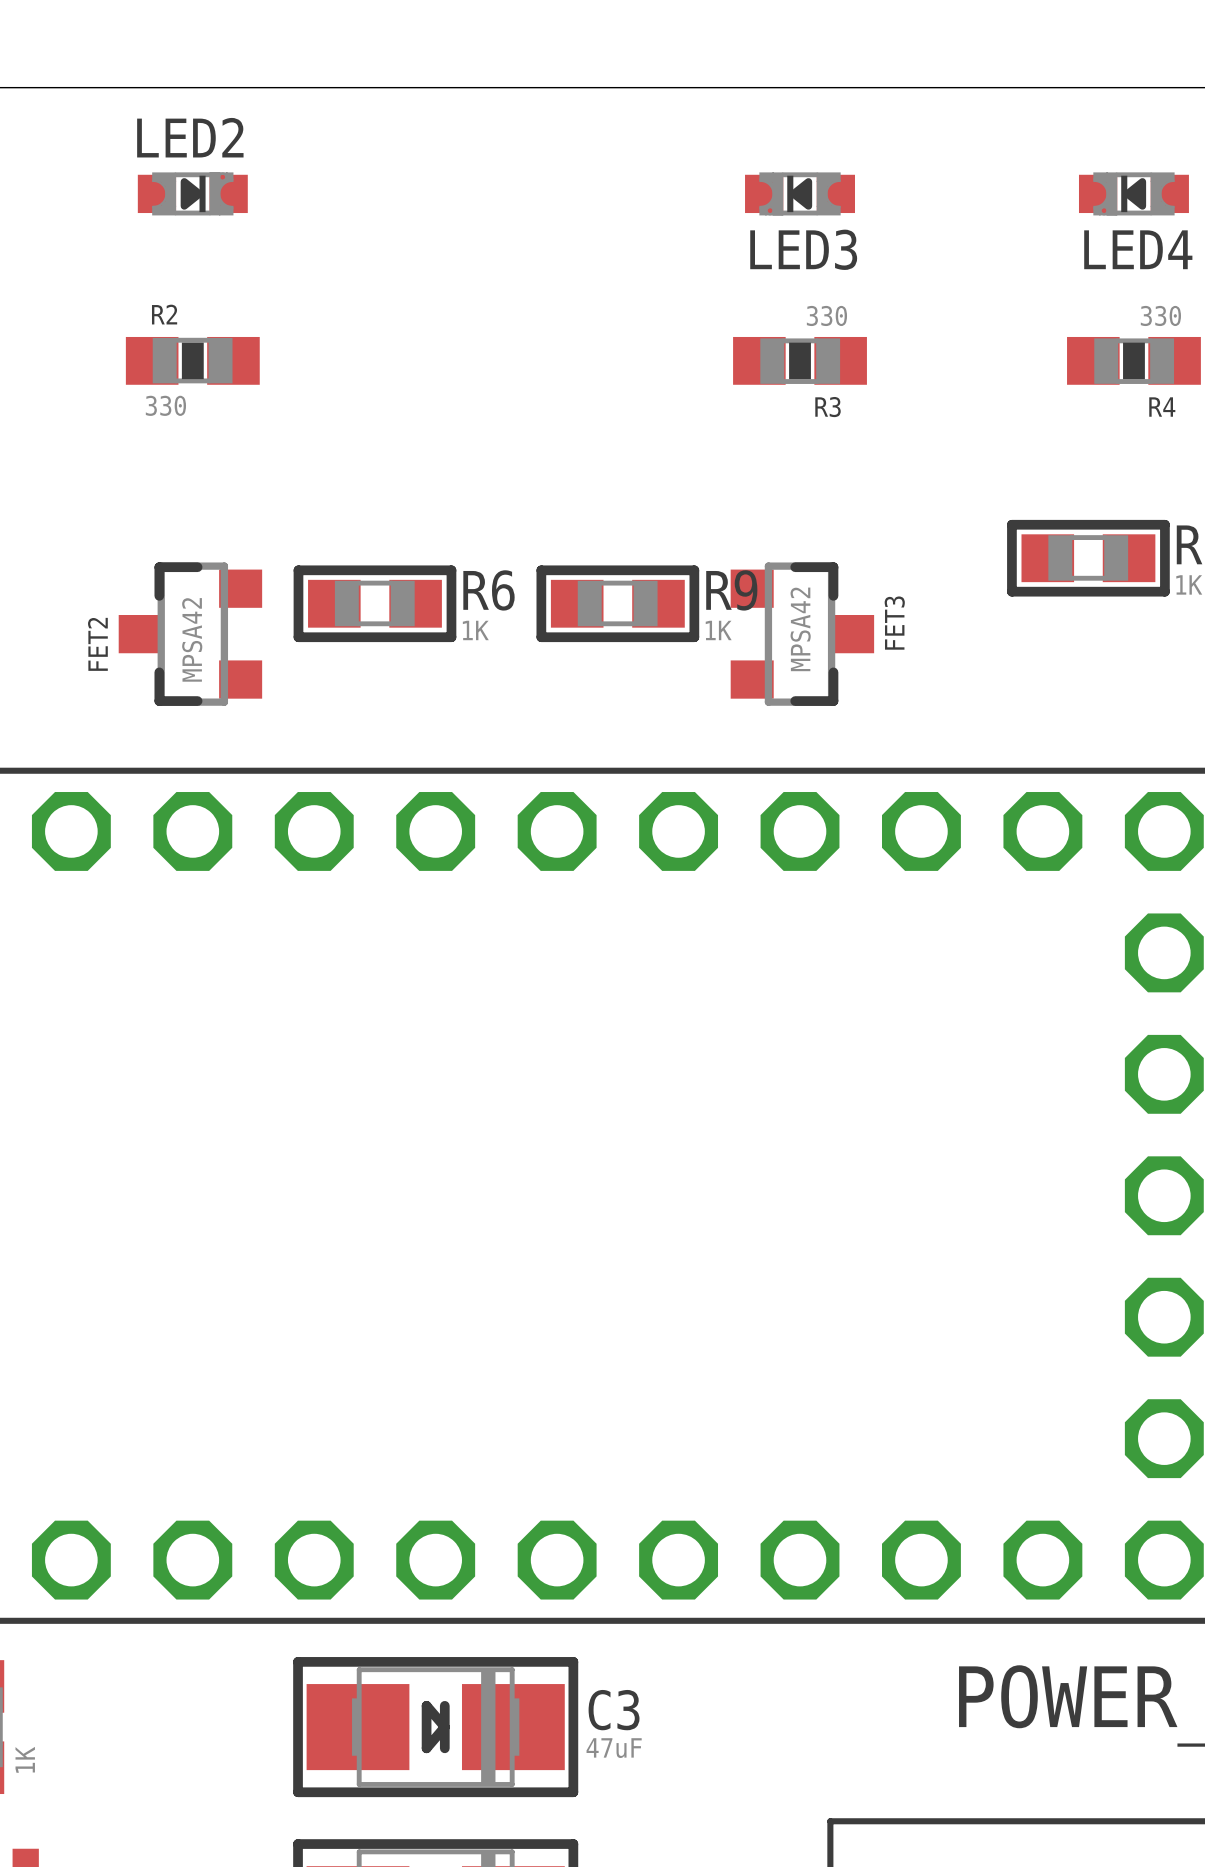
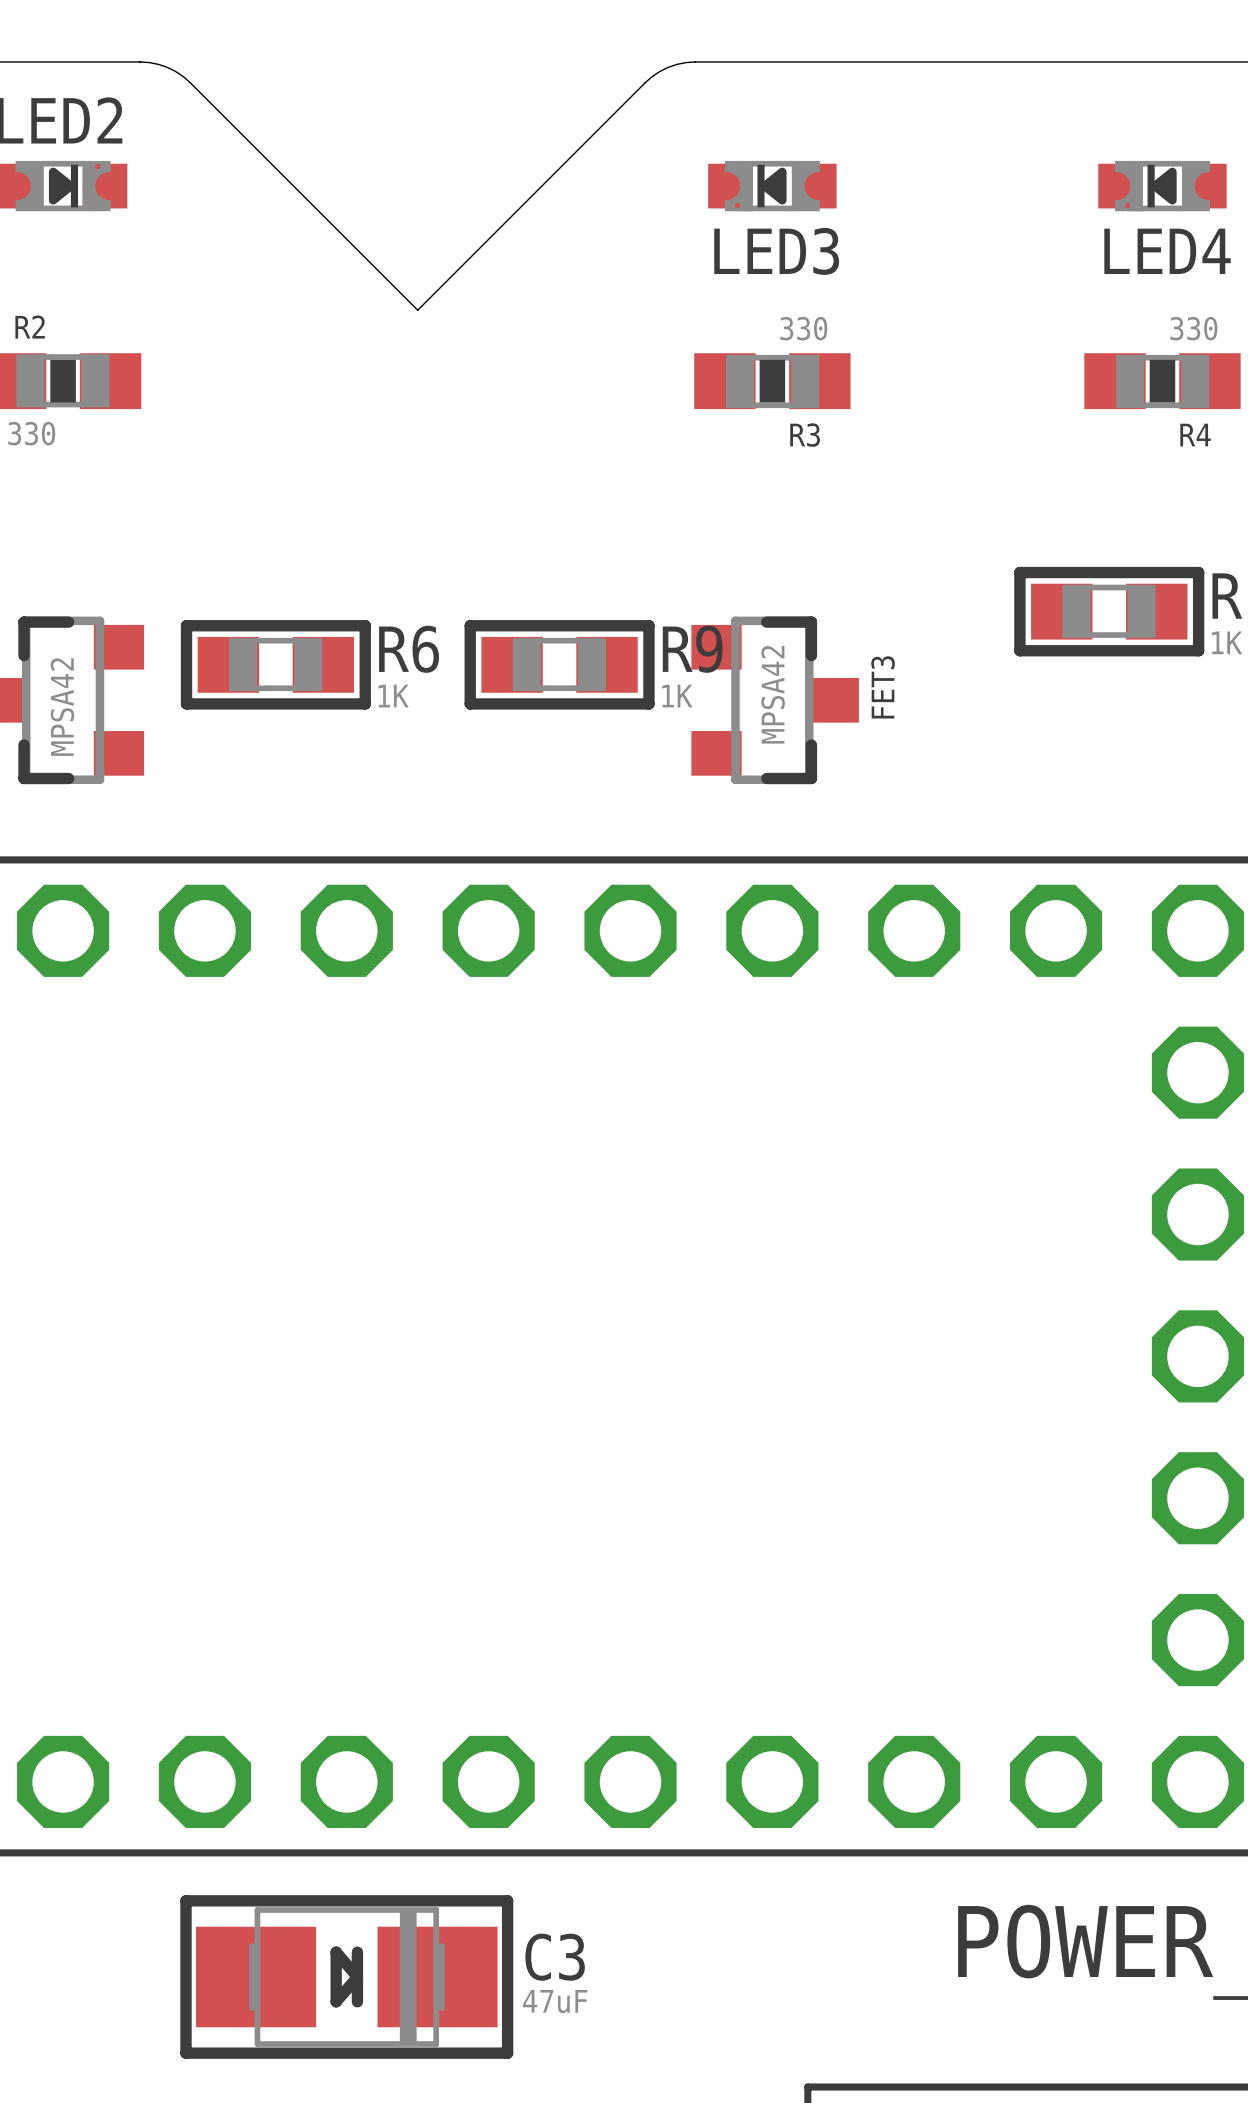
board edge: (258, 87) (734, 87) -> (140, 61) (167, 67) (190, 82) (417, 310) (645, 82) (668, 67) (695, 61)

